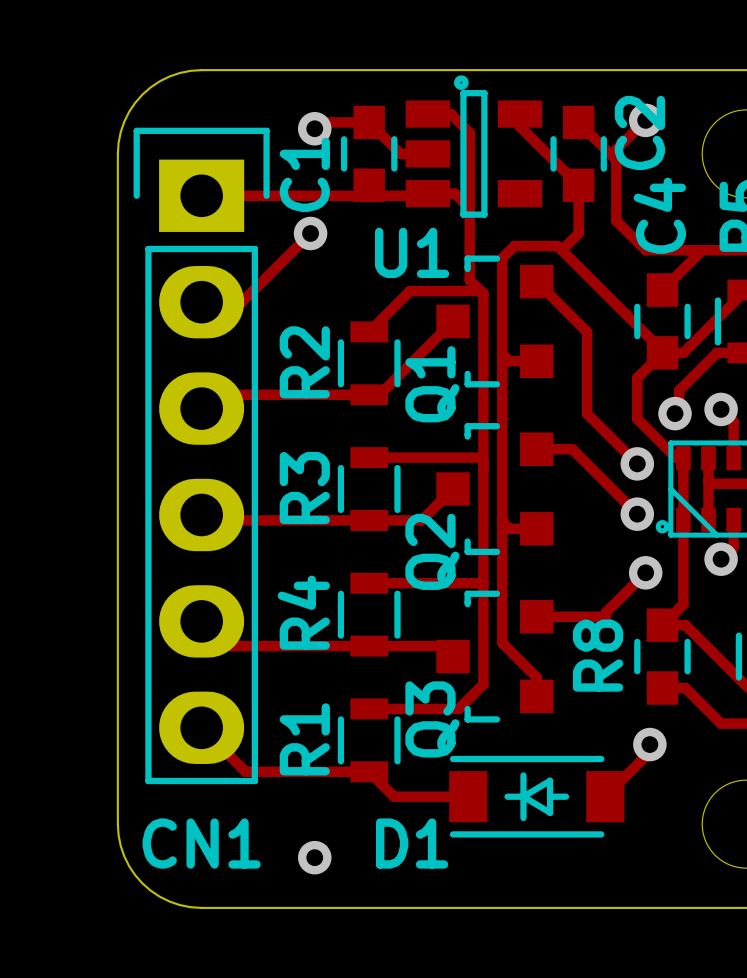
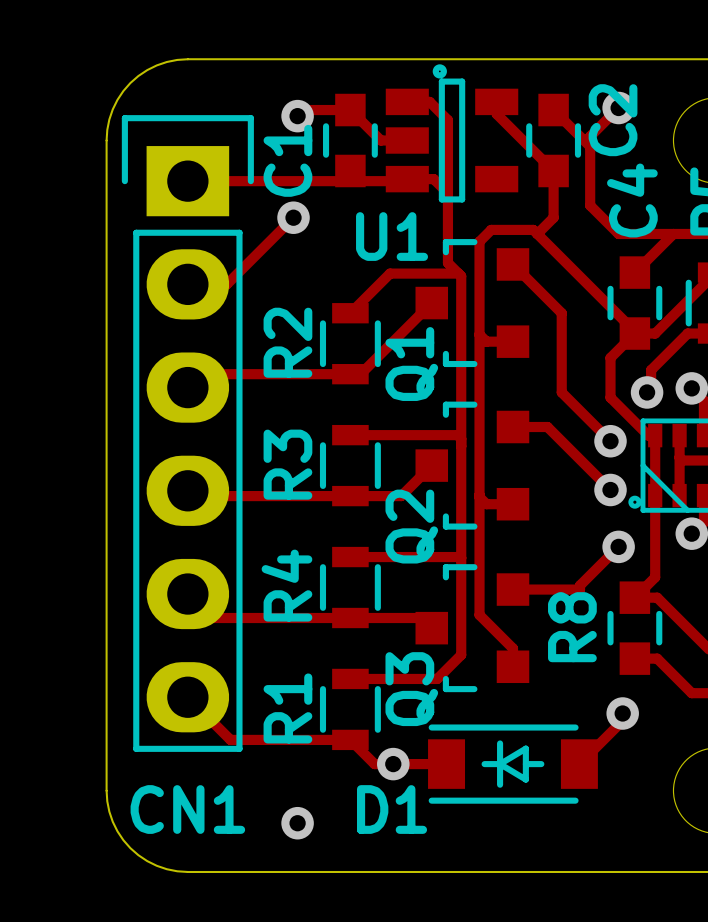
via: none -> (393, 764)

